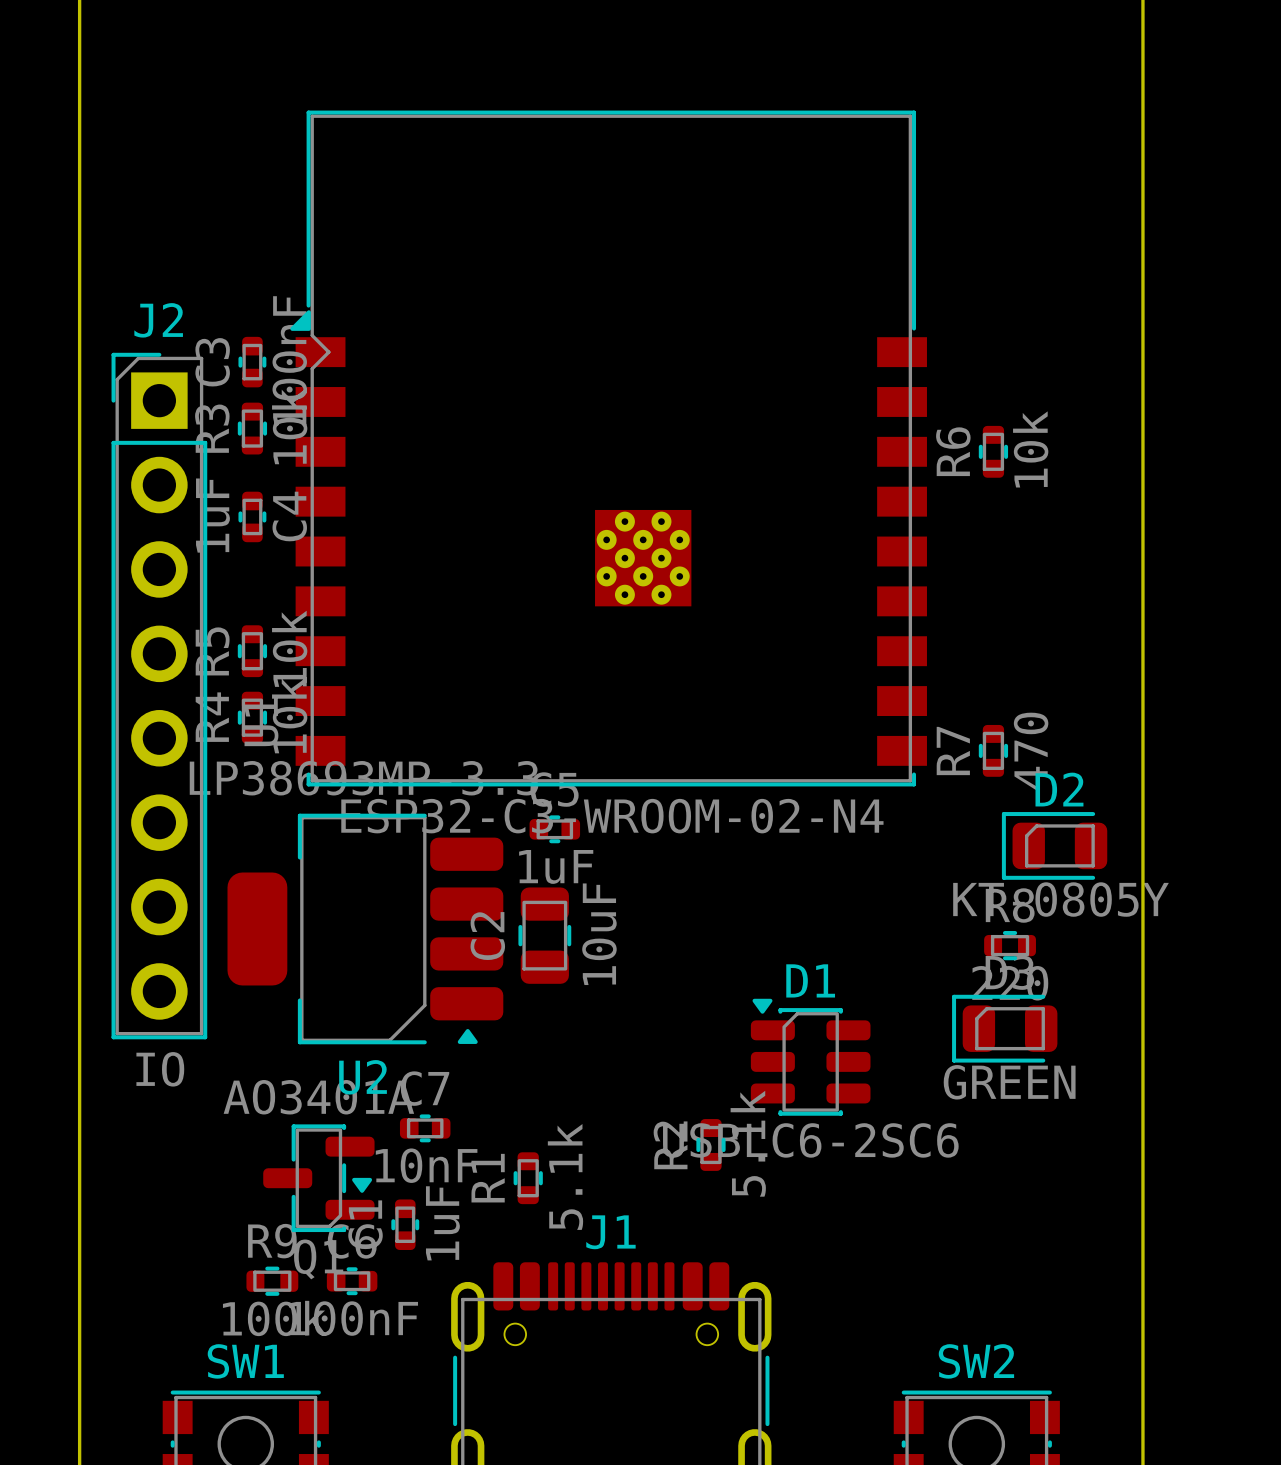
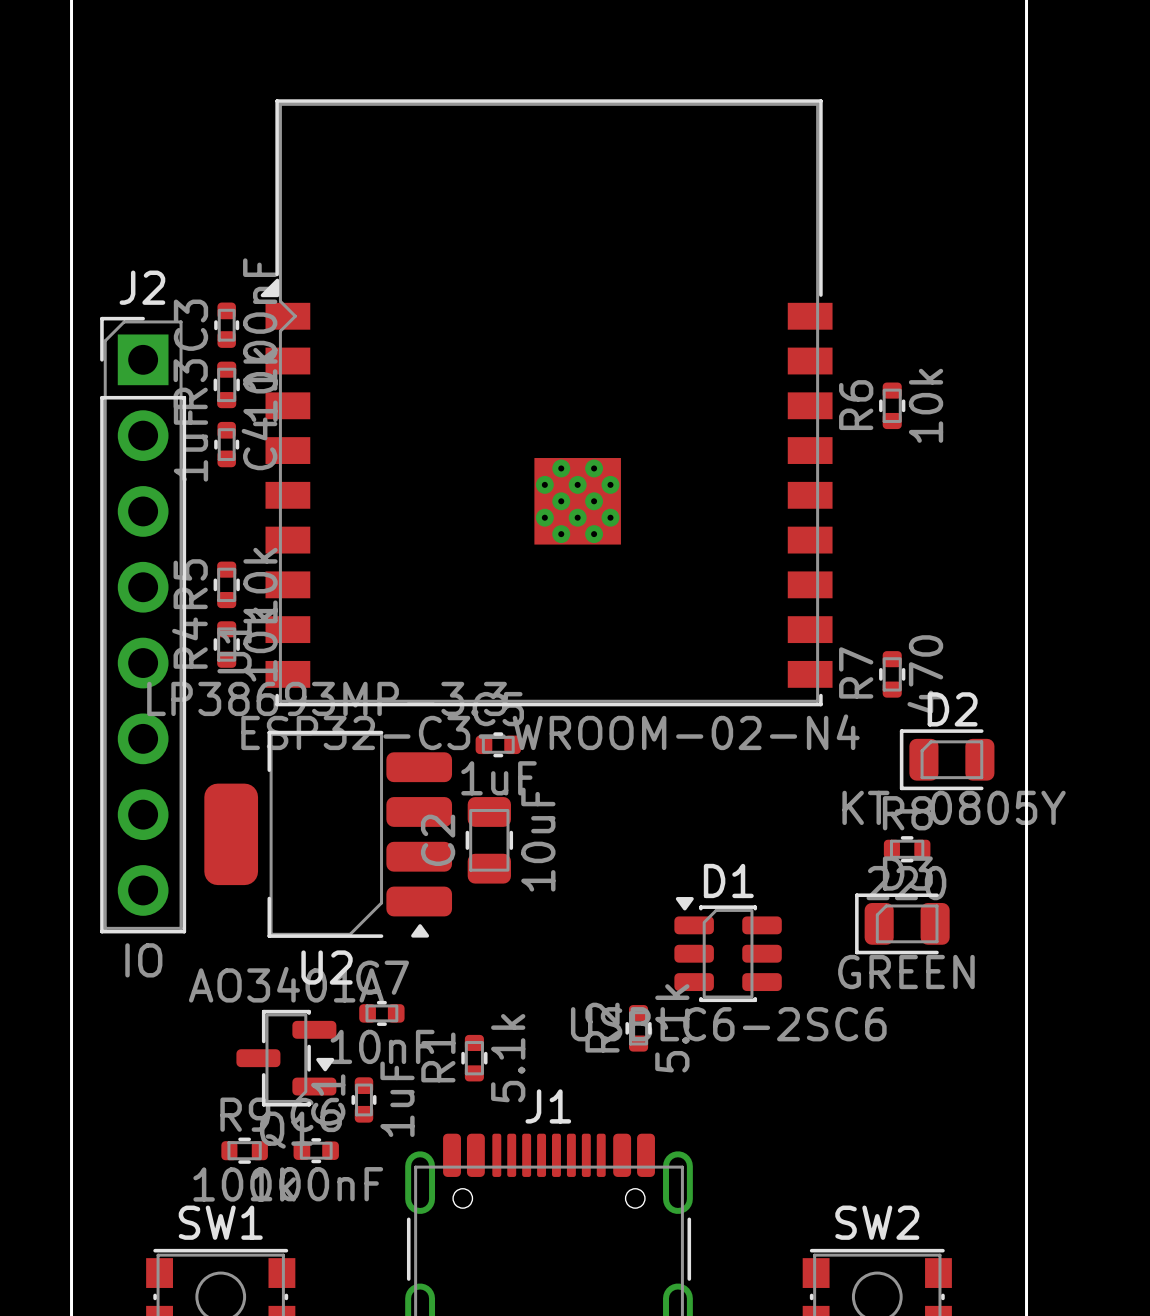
C4 position: (252, 516) -> (226, 444)

